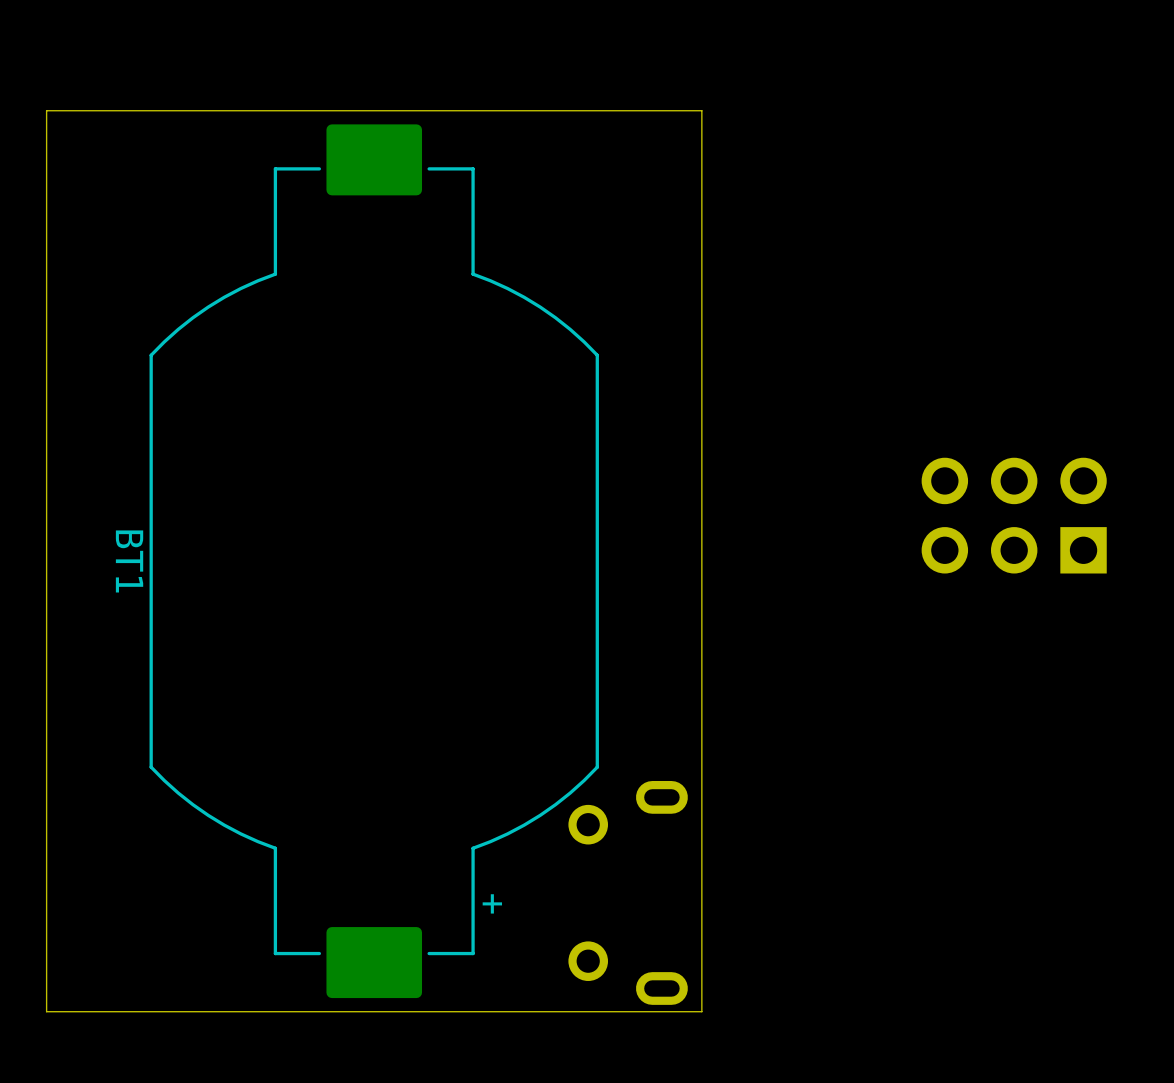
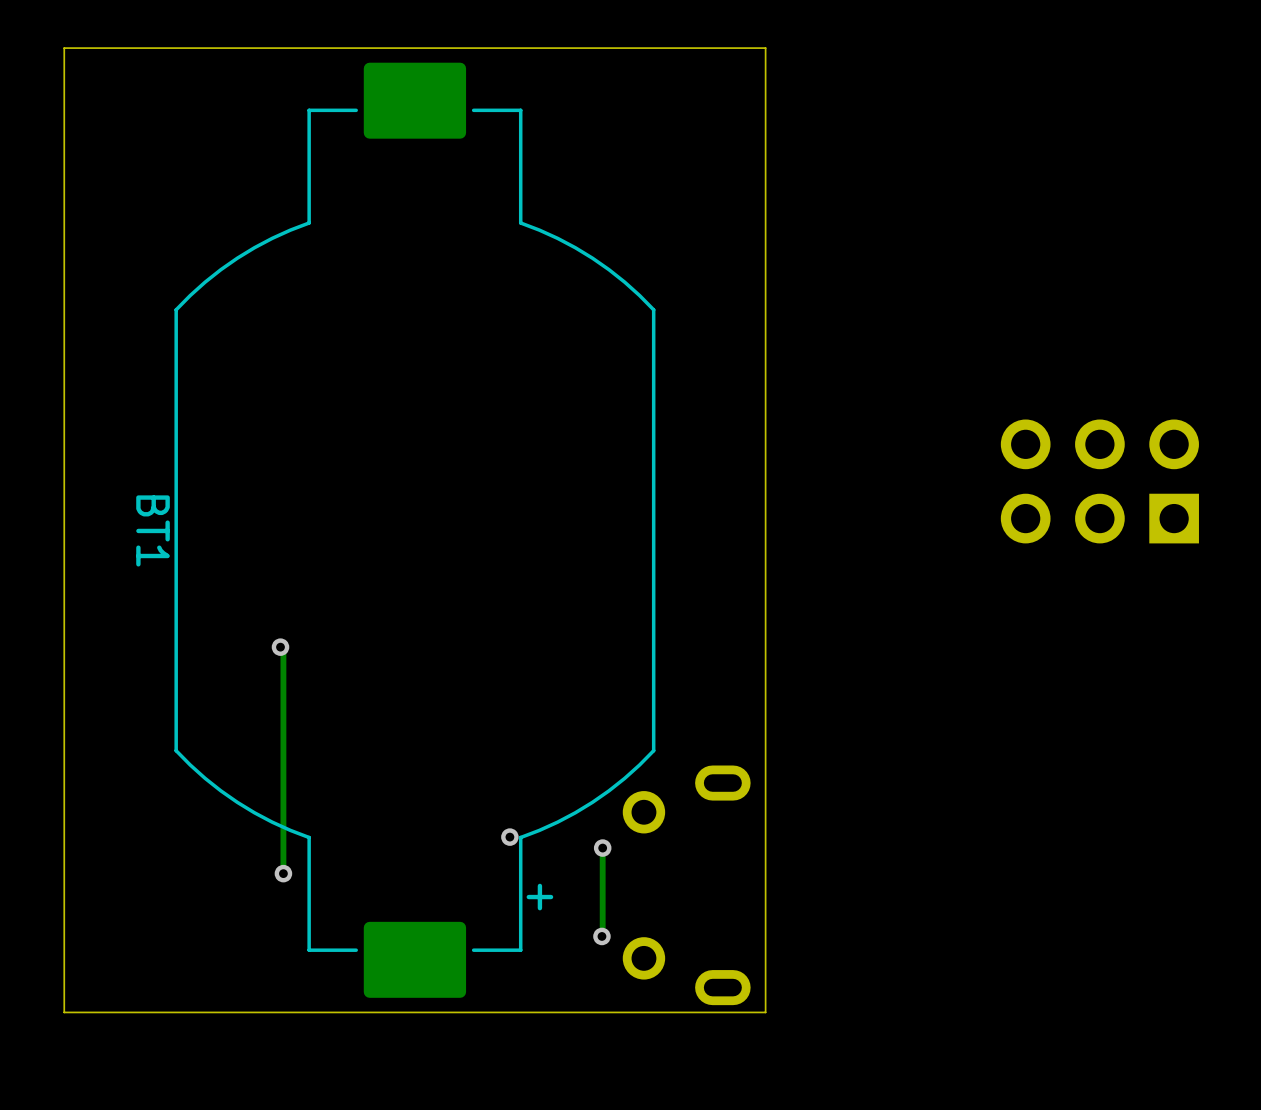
track: none -> (280, 647) (283, 650) (283, 873)
via: none -> (280, 647)
via: none -> (509, 837)
track: none -> (602, 848) (601, 936)
via: none -> (602, 848)
via: none -> (283, 873)
via: none -> (601, 936)

